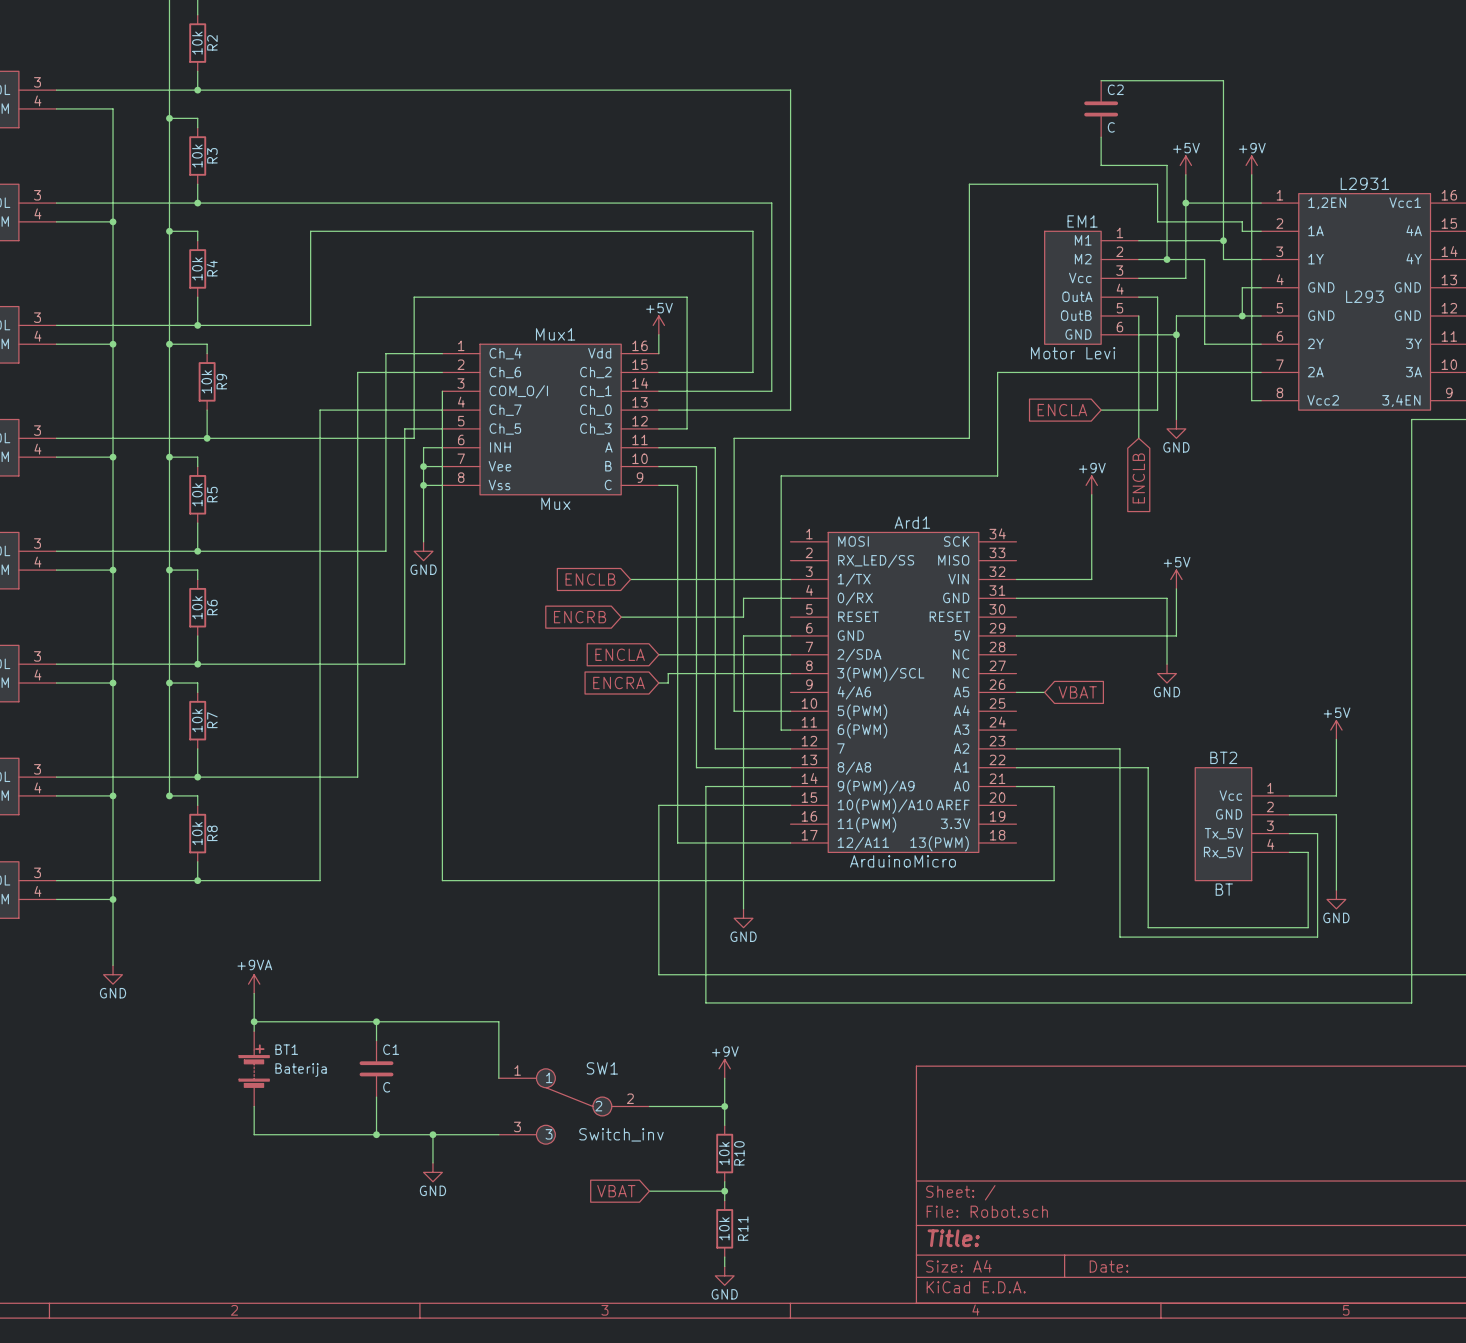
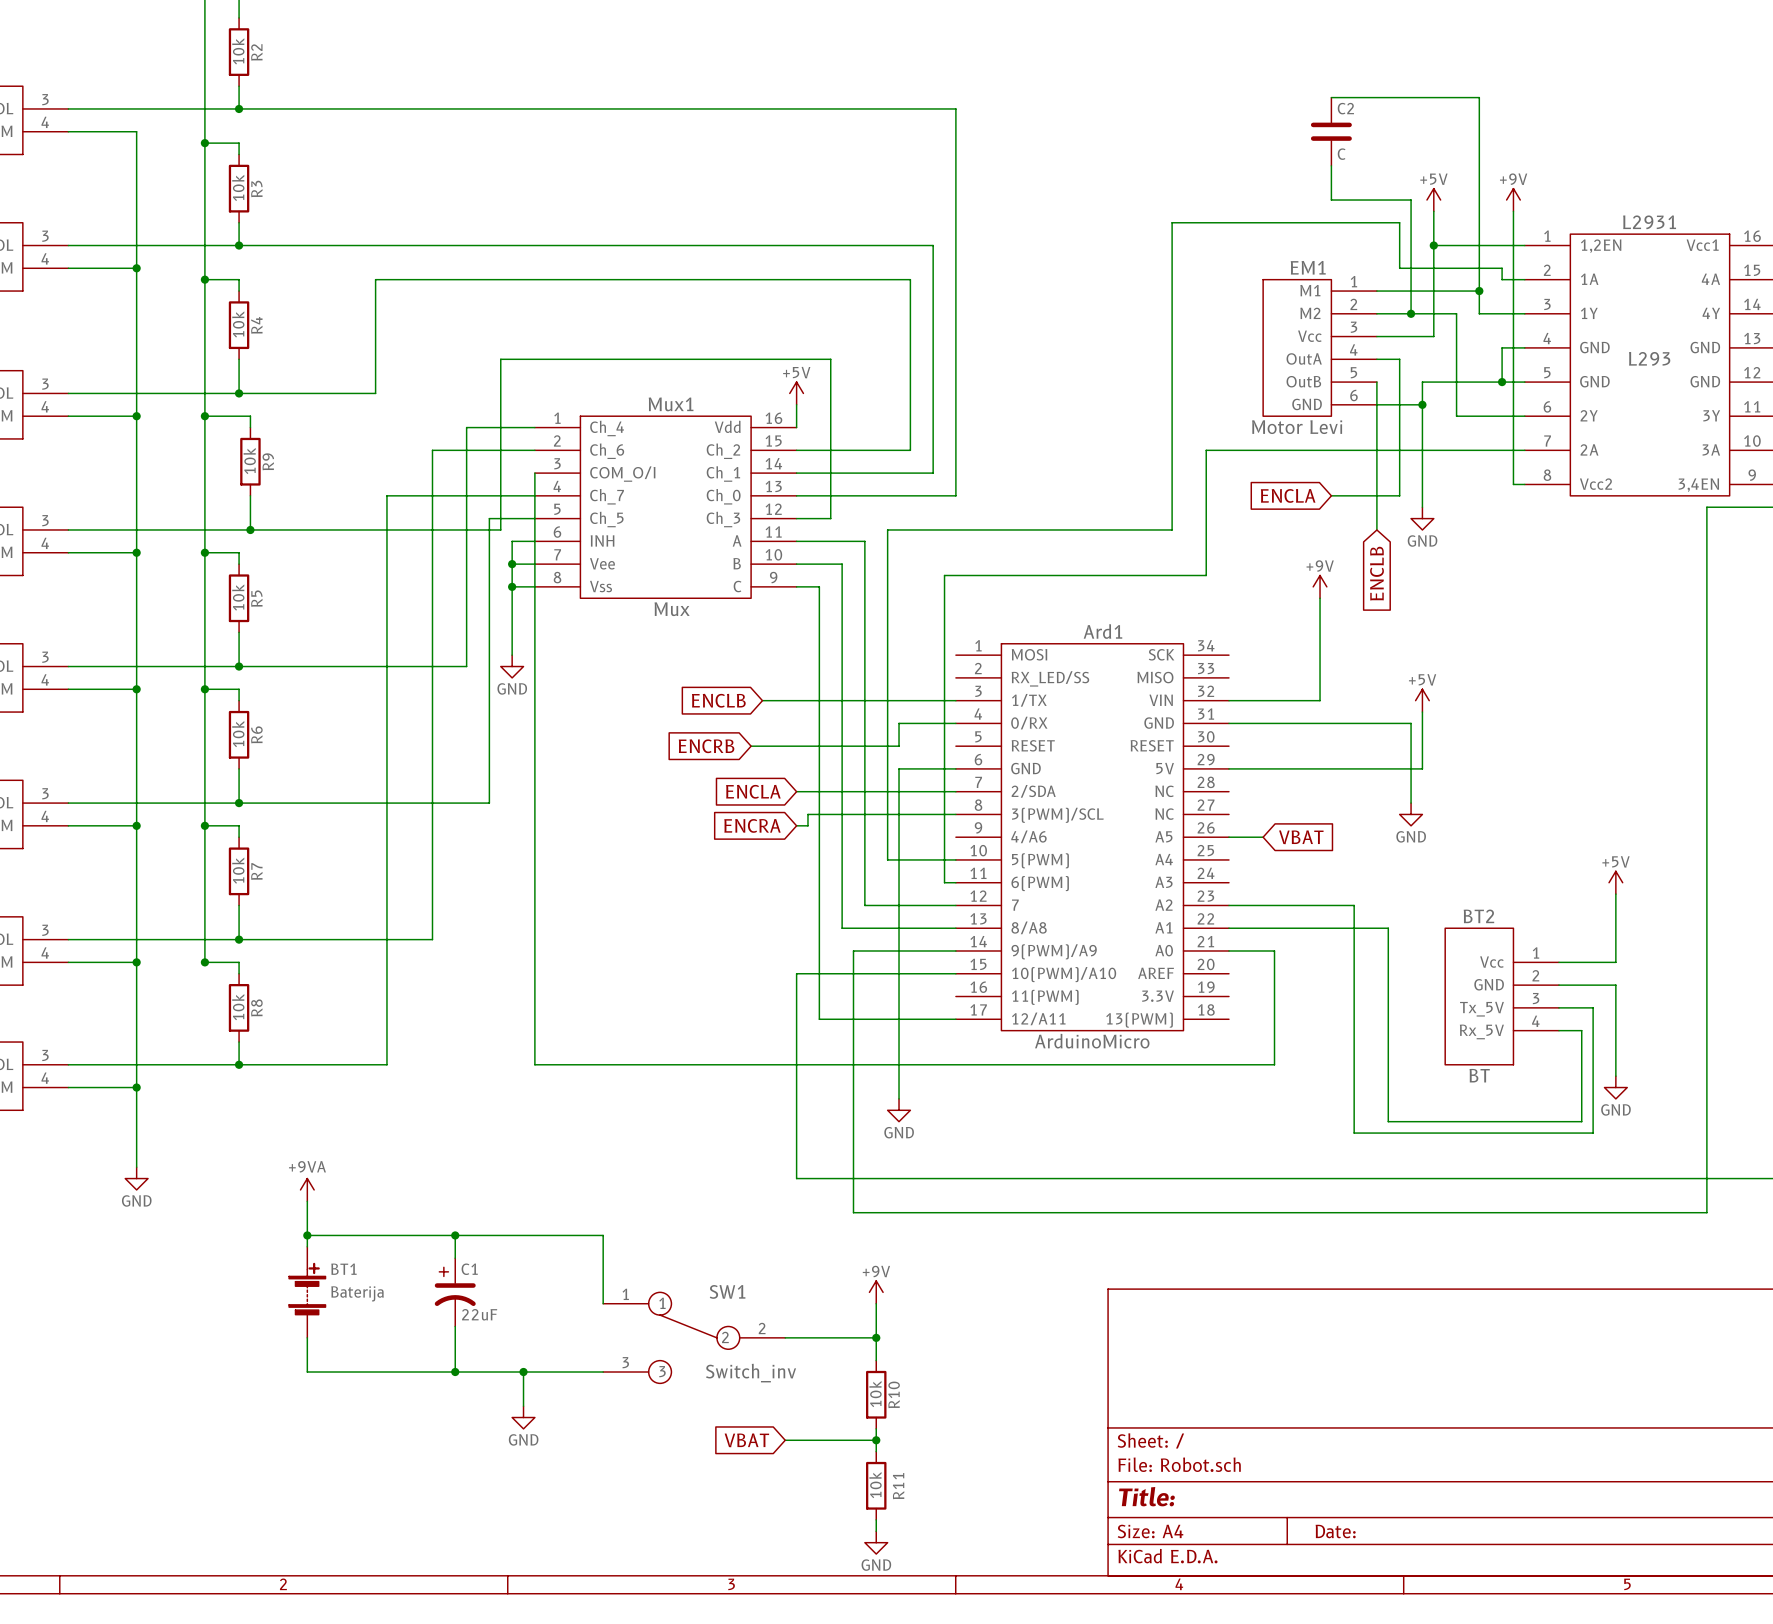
C1 symbol: [359, 1040, 394, 1098] -> [434, 1258, 476, 1327]
C1 value: C (386, 1087) -> 22uF (479, 1314)

